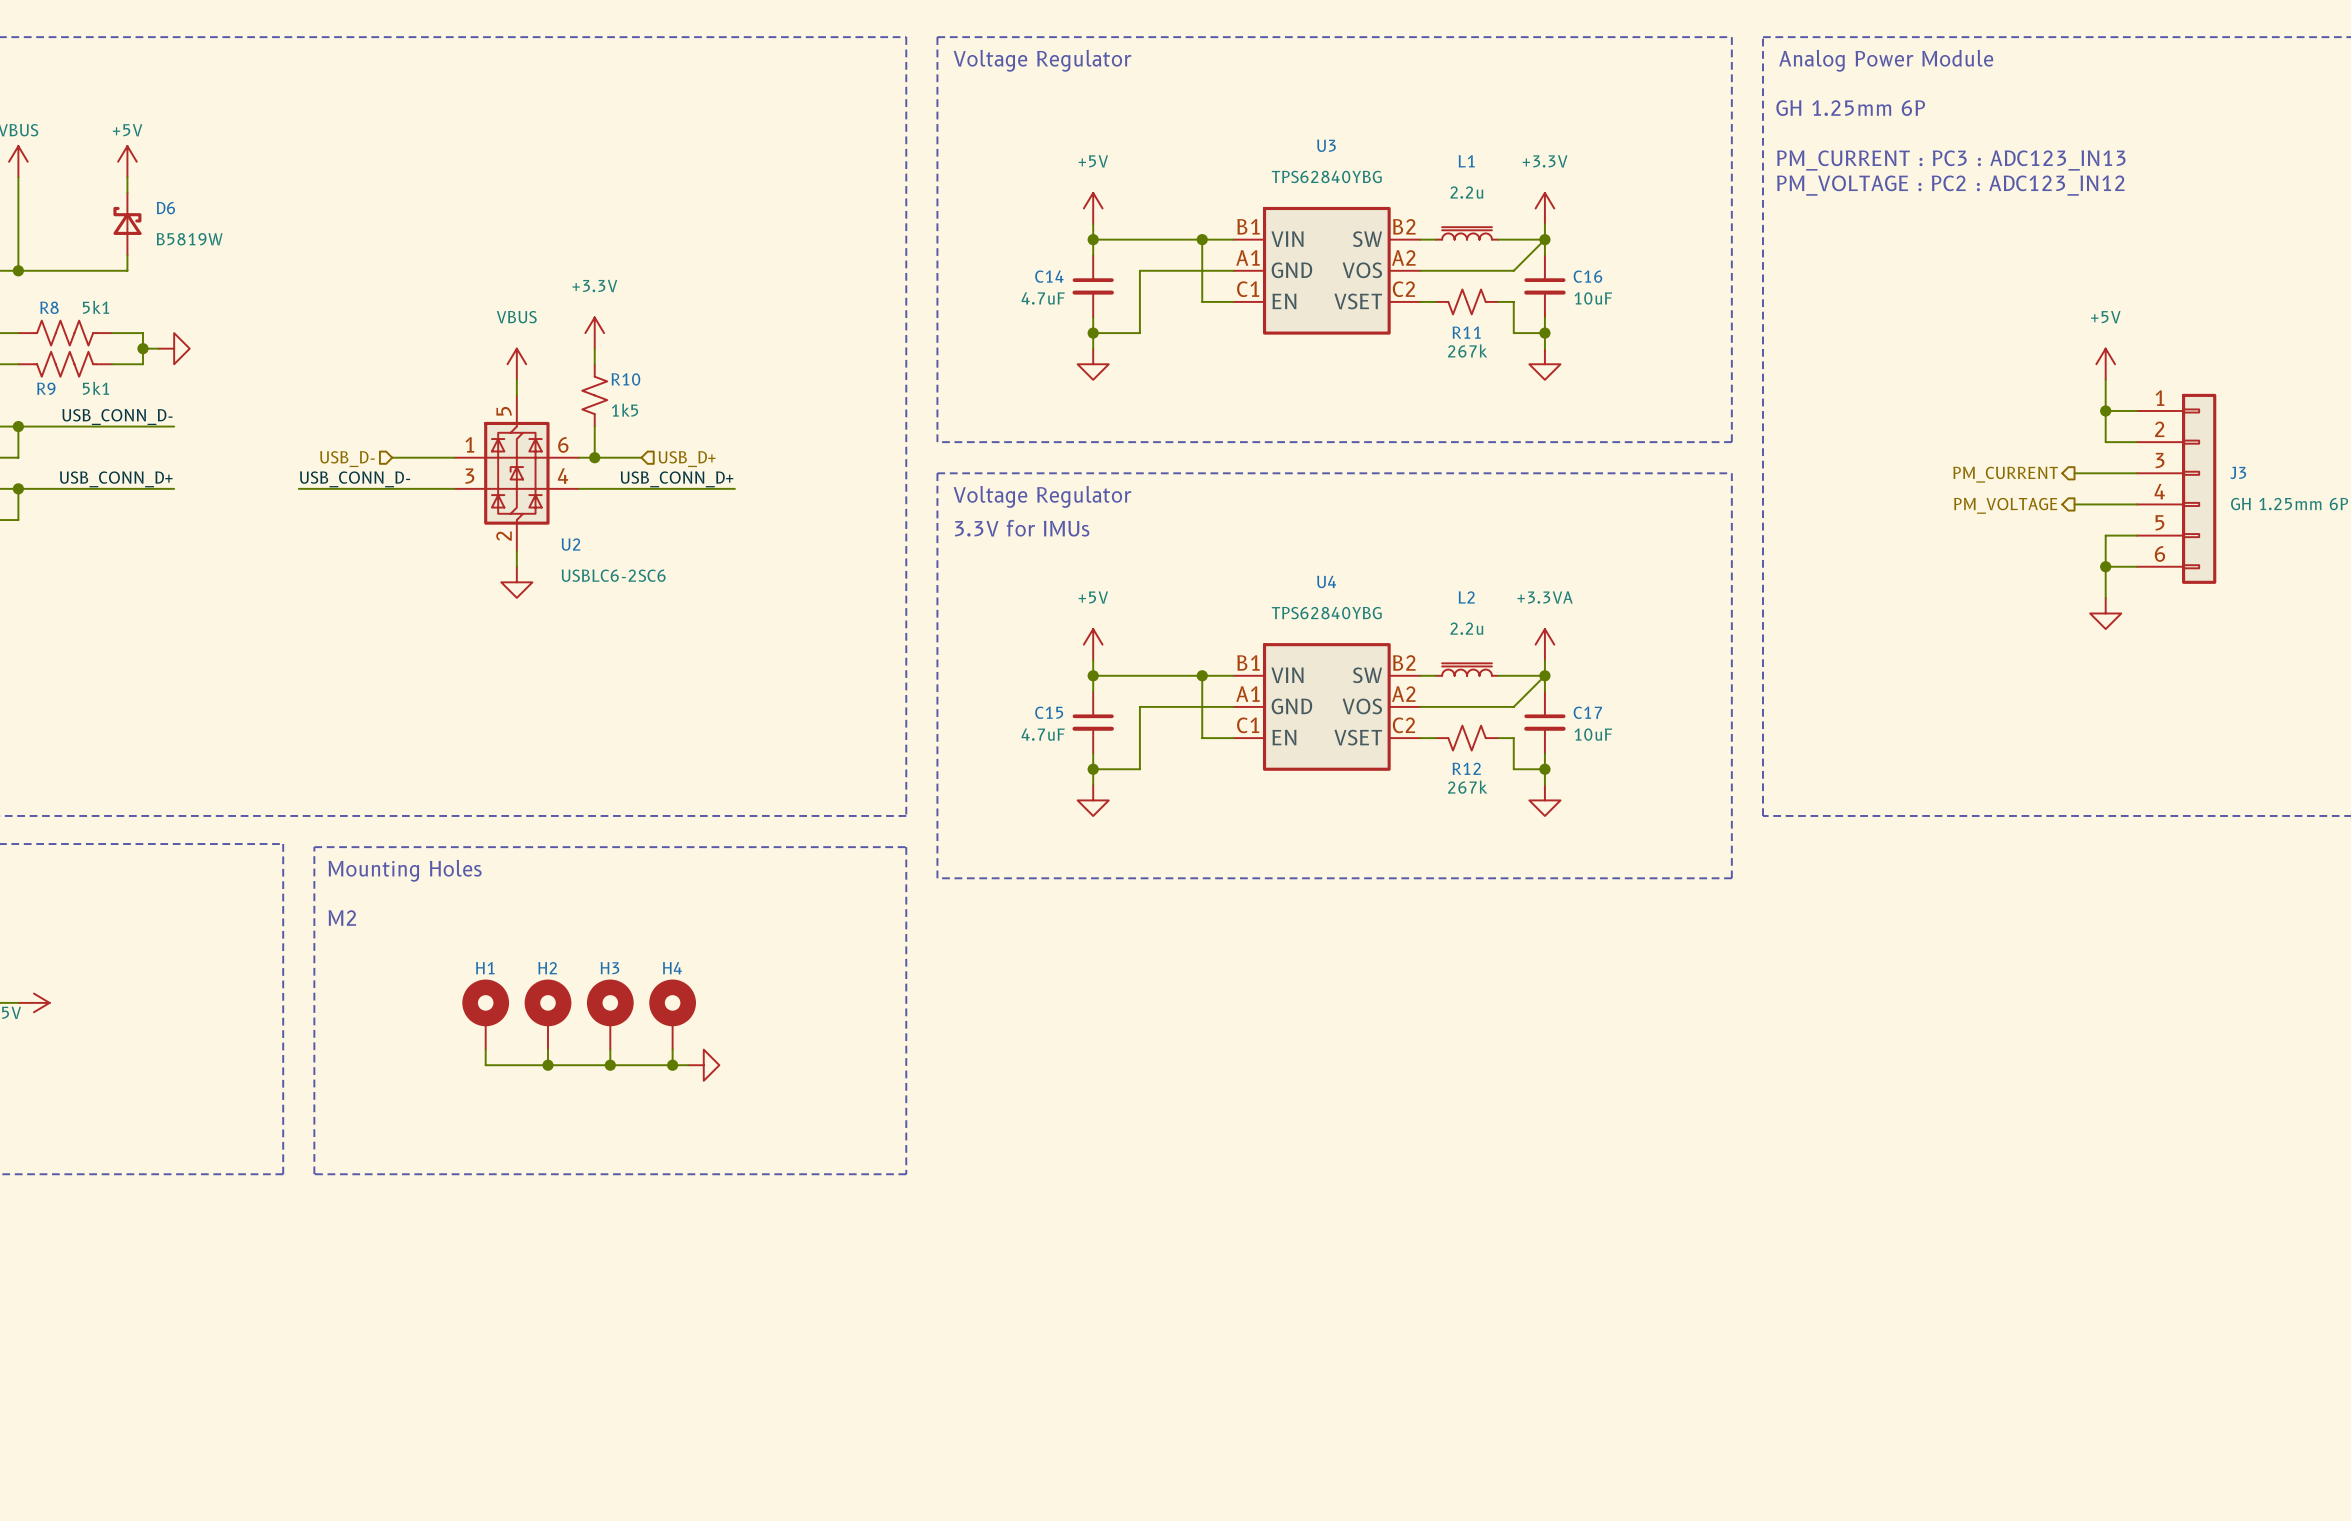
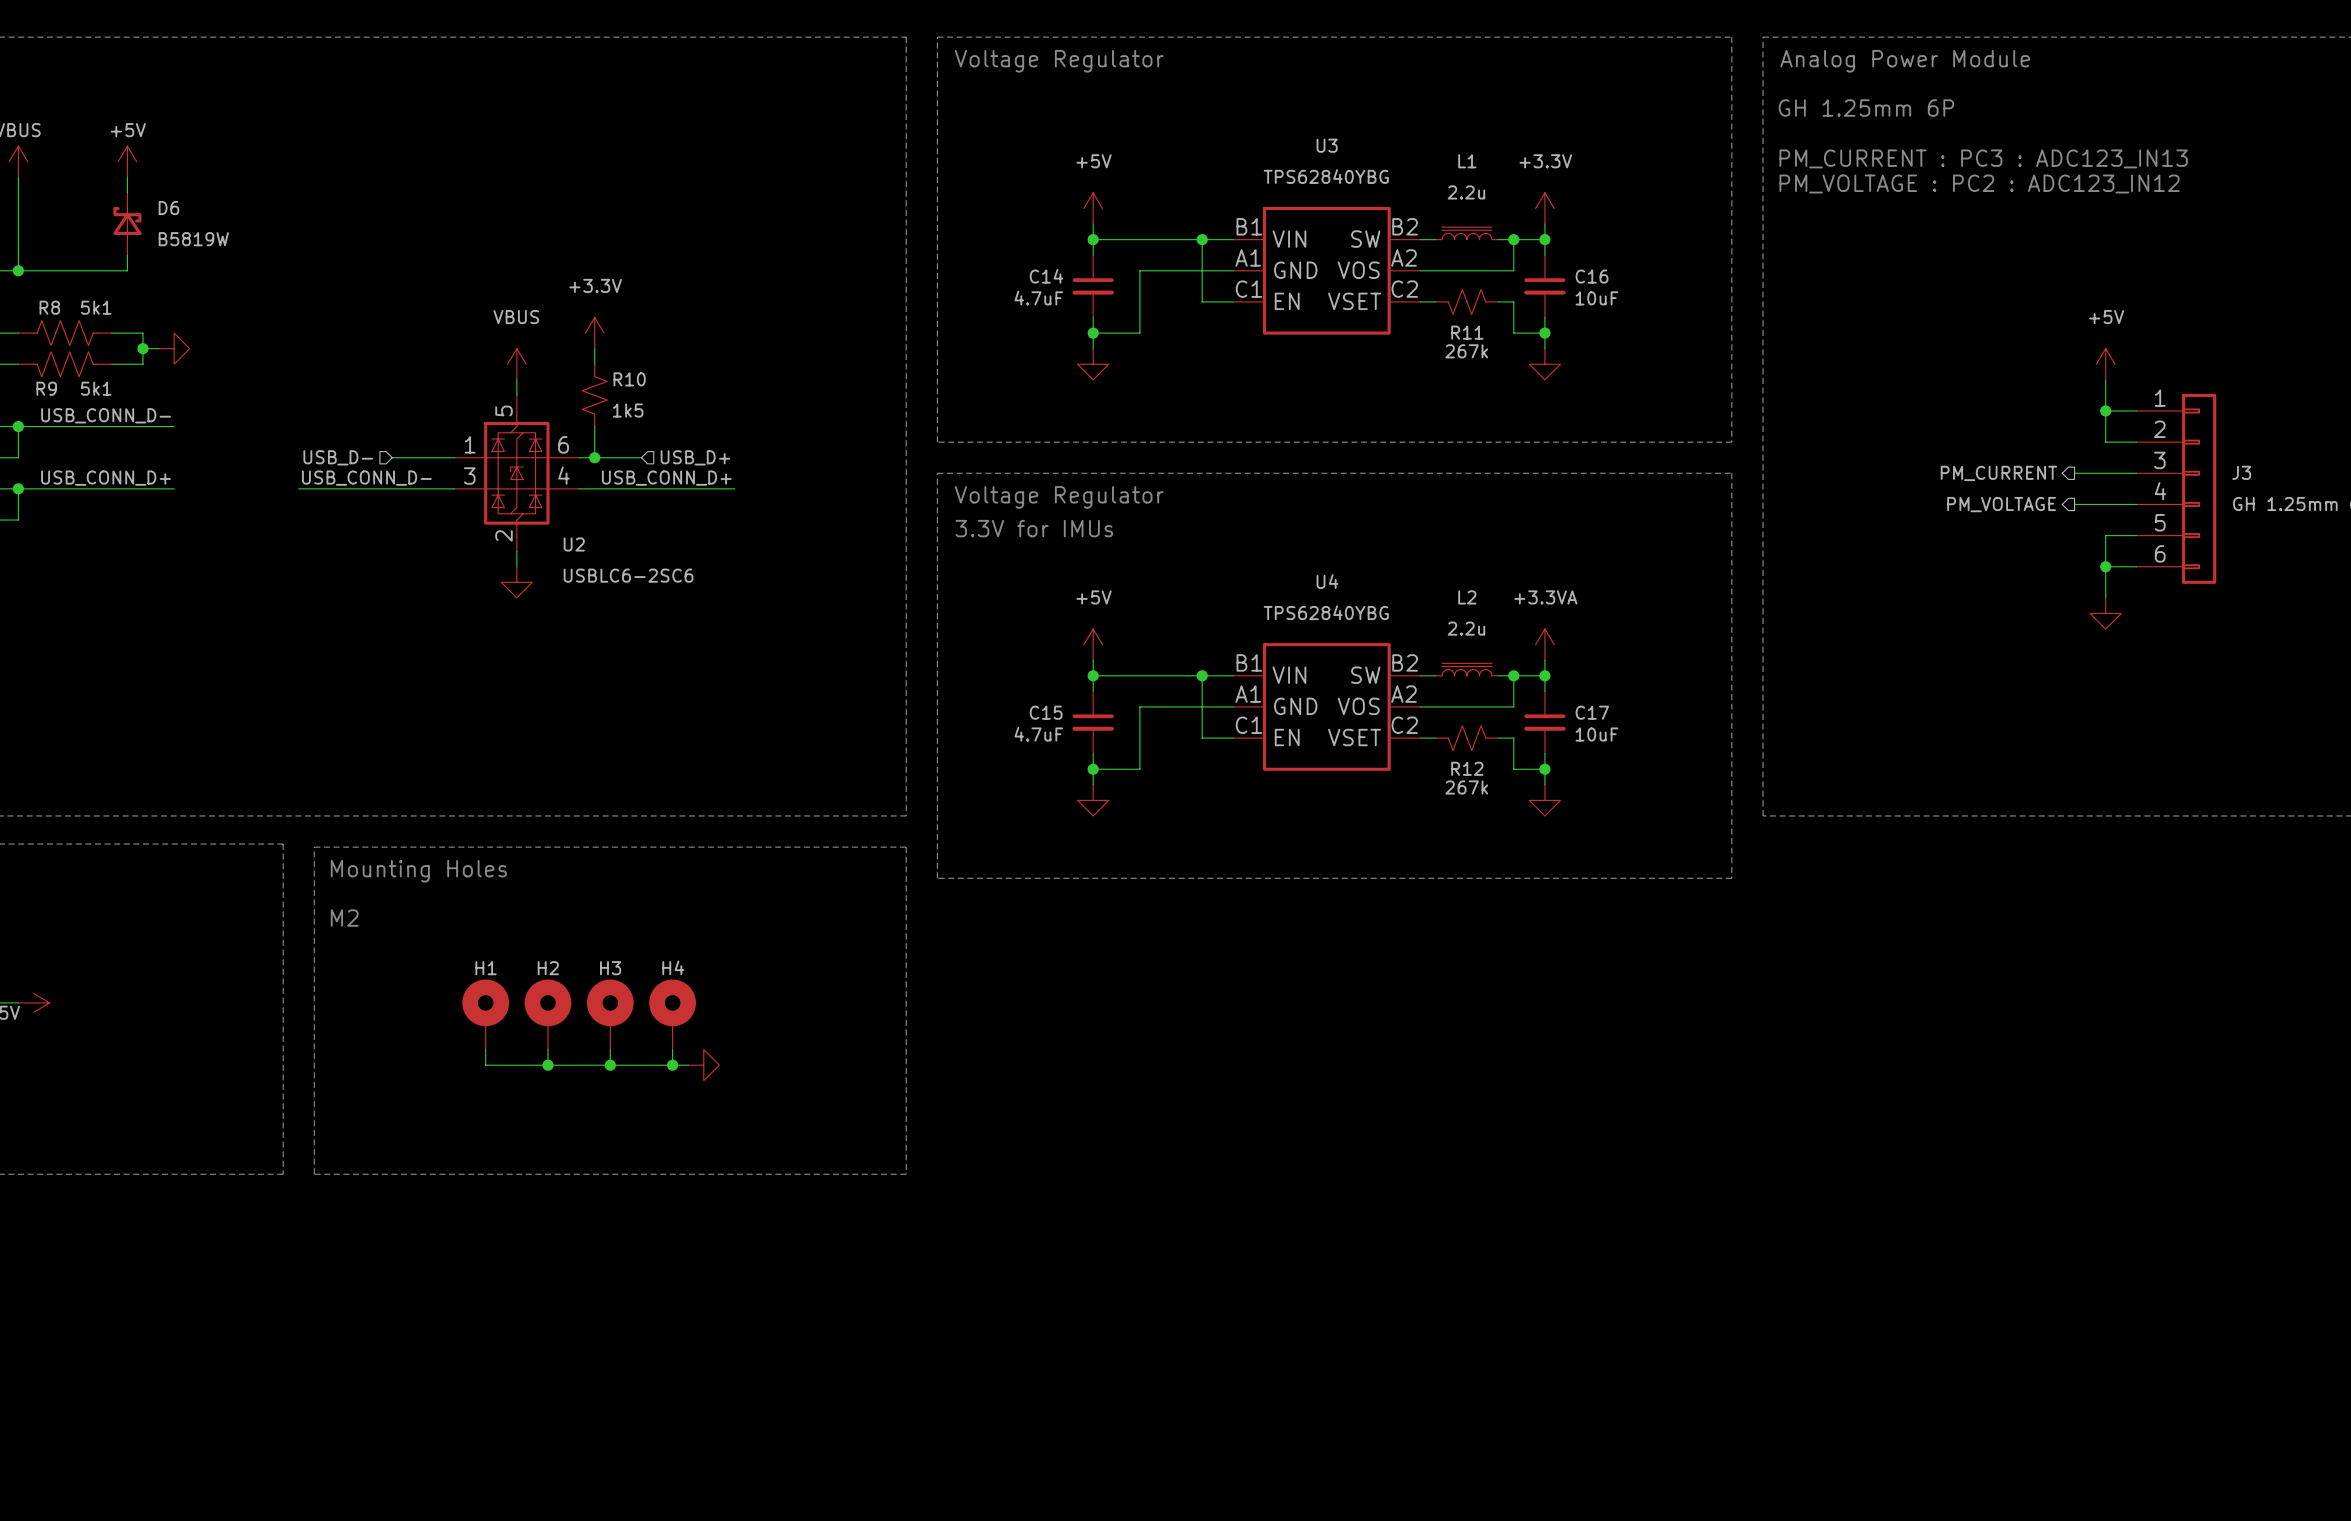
junction: none -> (1513, 239)
wire: (1544, 239) (1513, 270) -> (1513, 239) (1513, 270)
junction: none -> (1513, 675)
wire: (1544, 675) (1513, 706) -> (1513, 675) (1513, 706)

